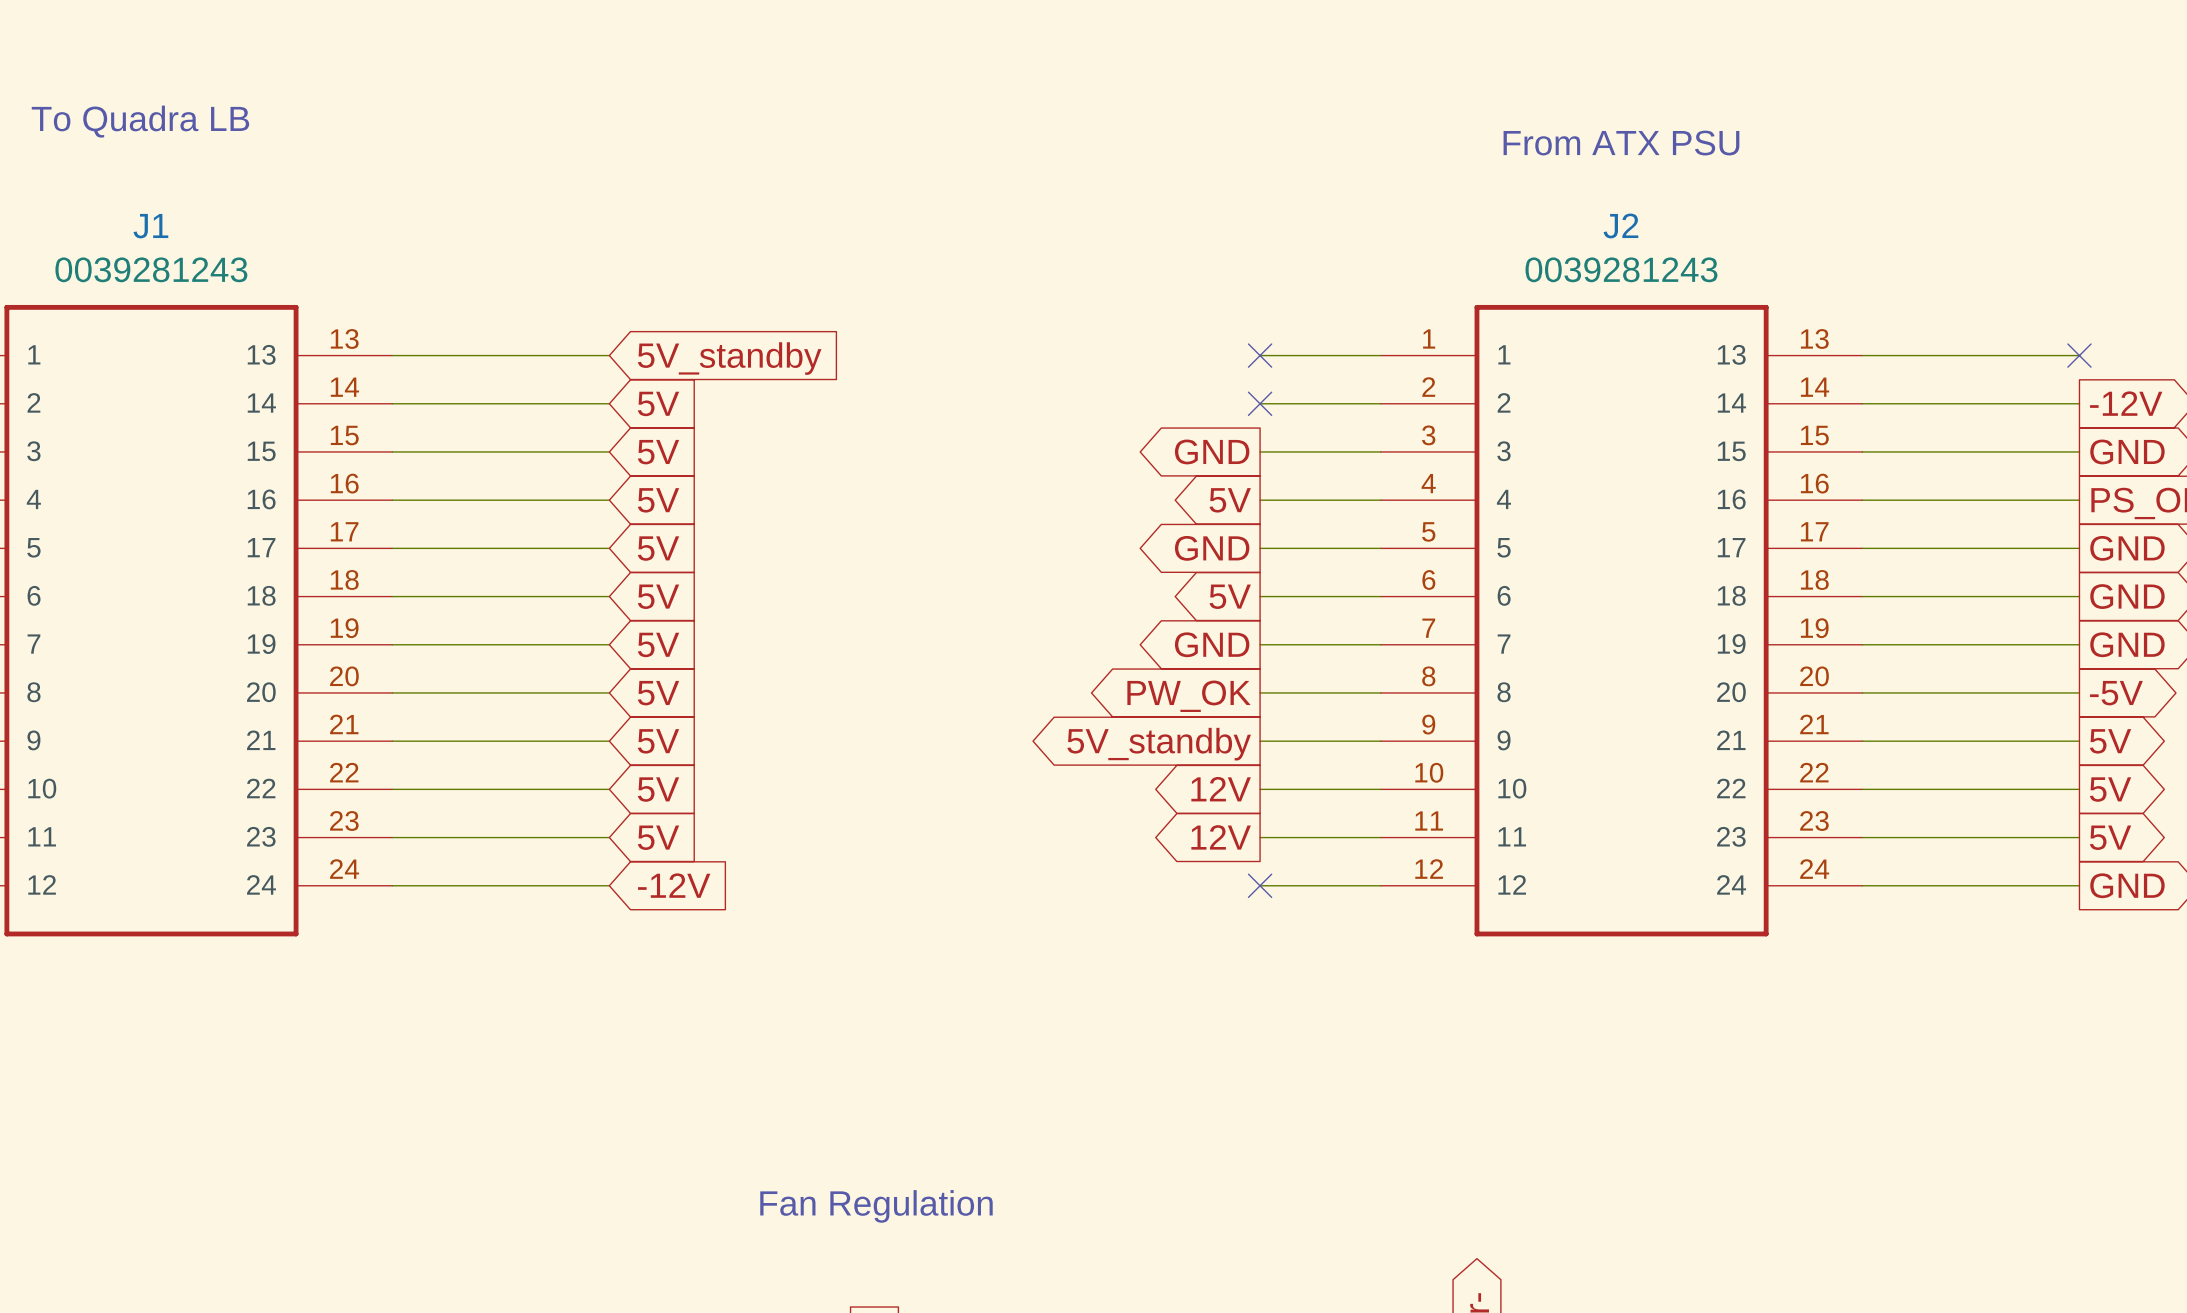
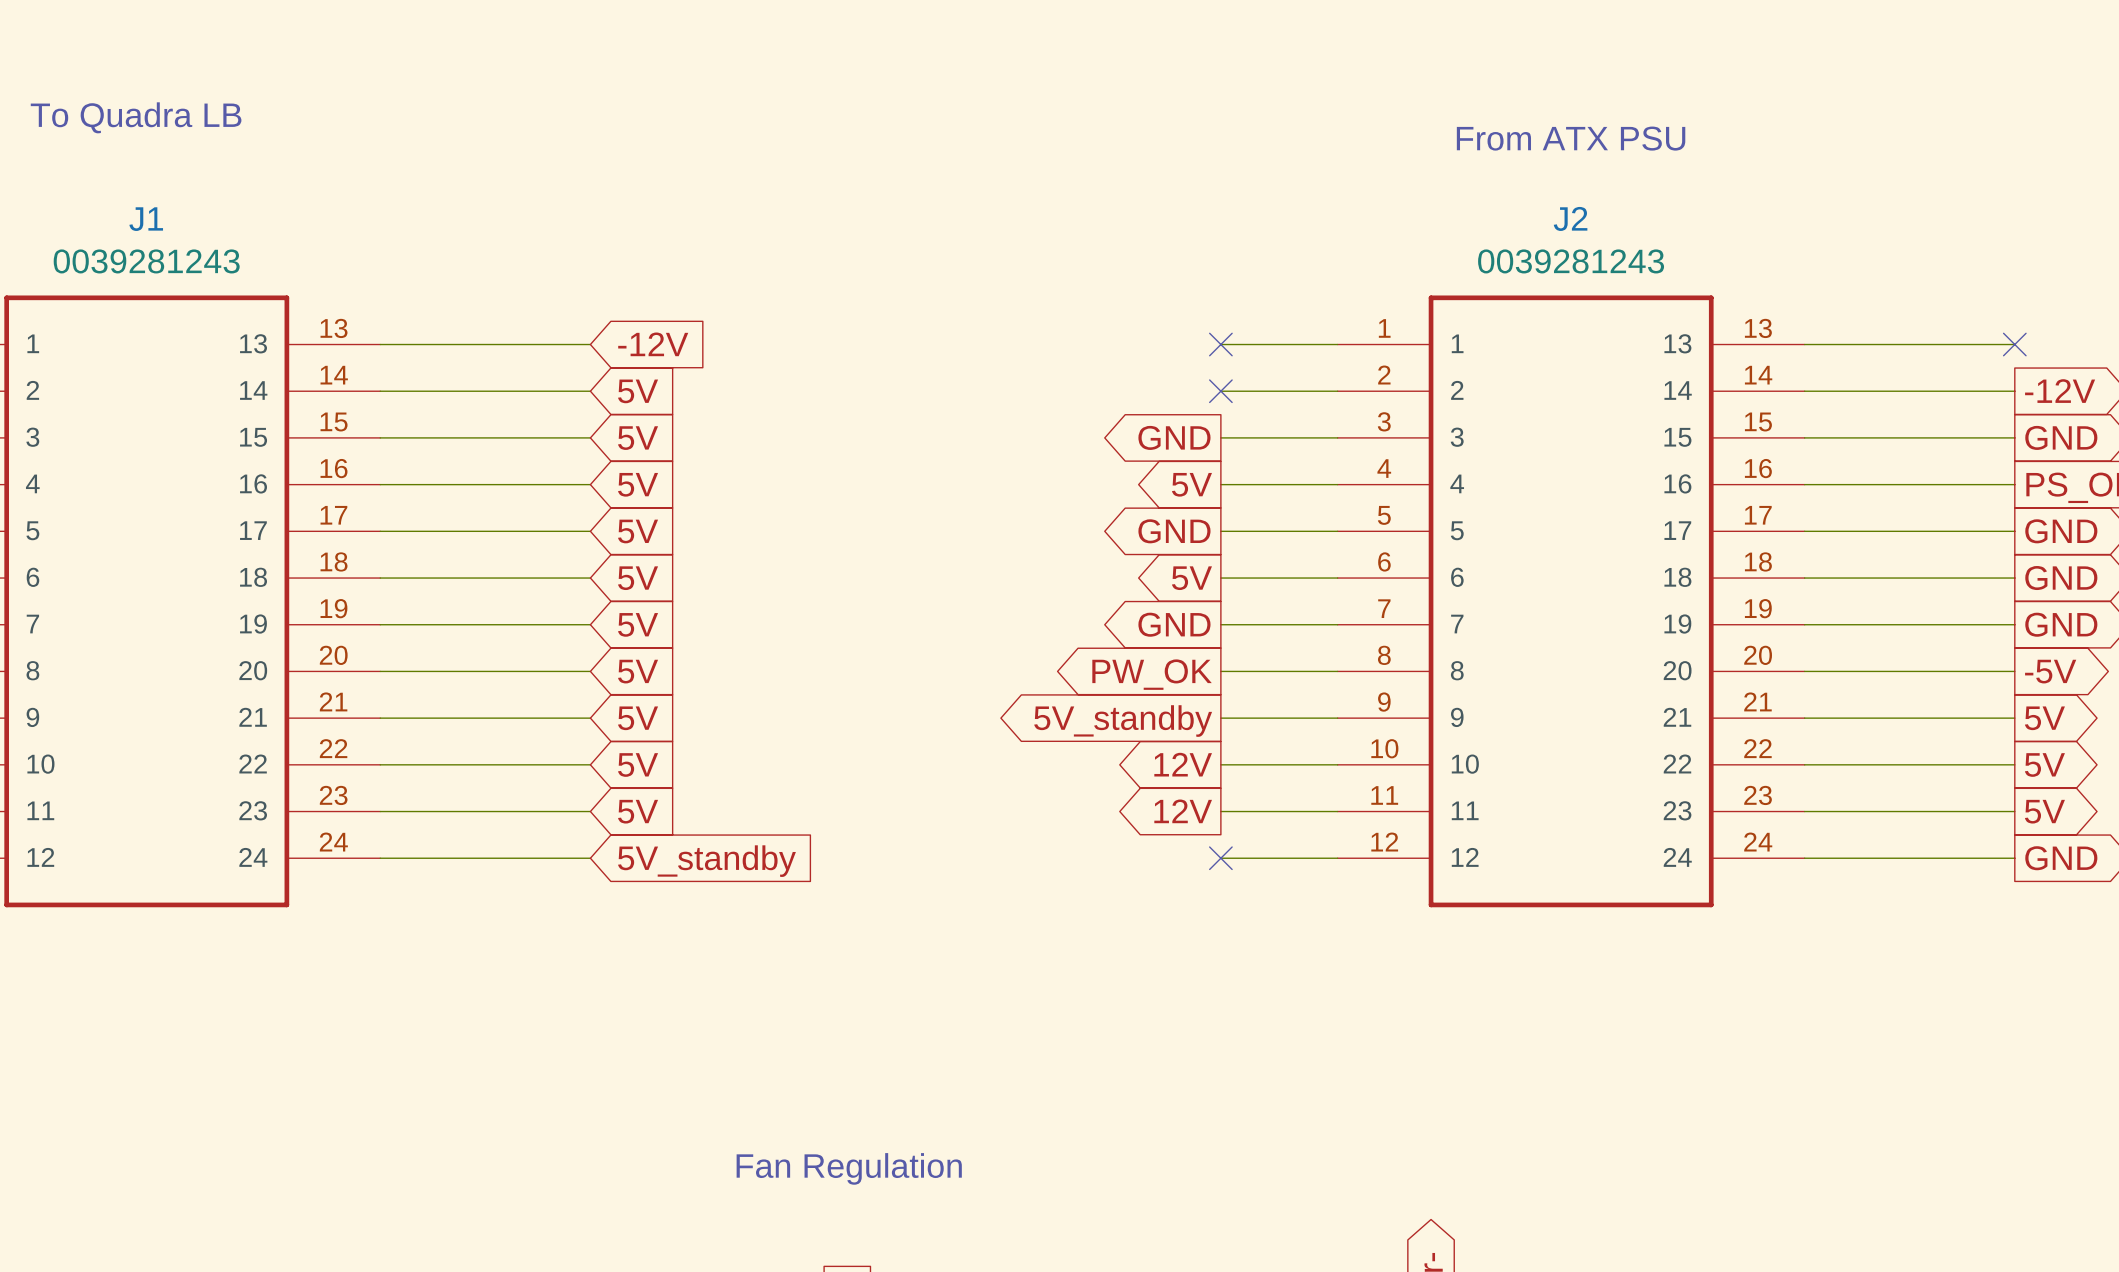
global label: 5V_standby (729, 358) -> -12V (653, 344)
global label: -12V (674, 885) -> 5V_standby (706, 861)

